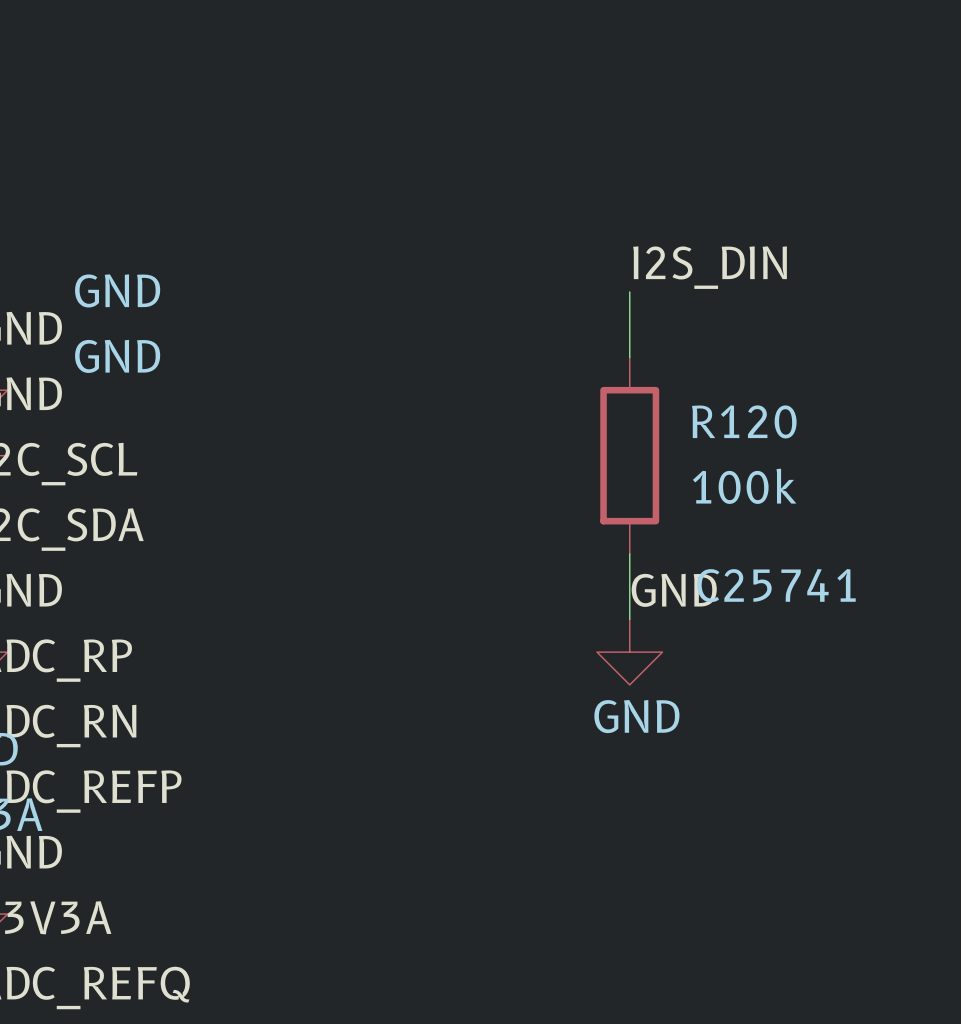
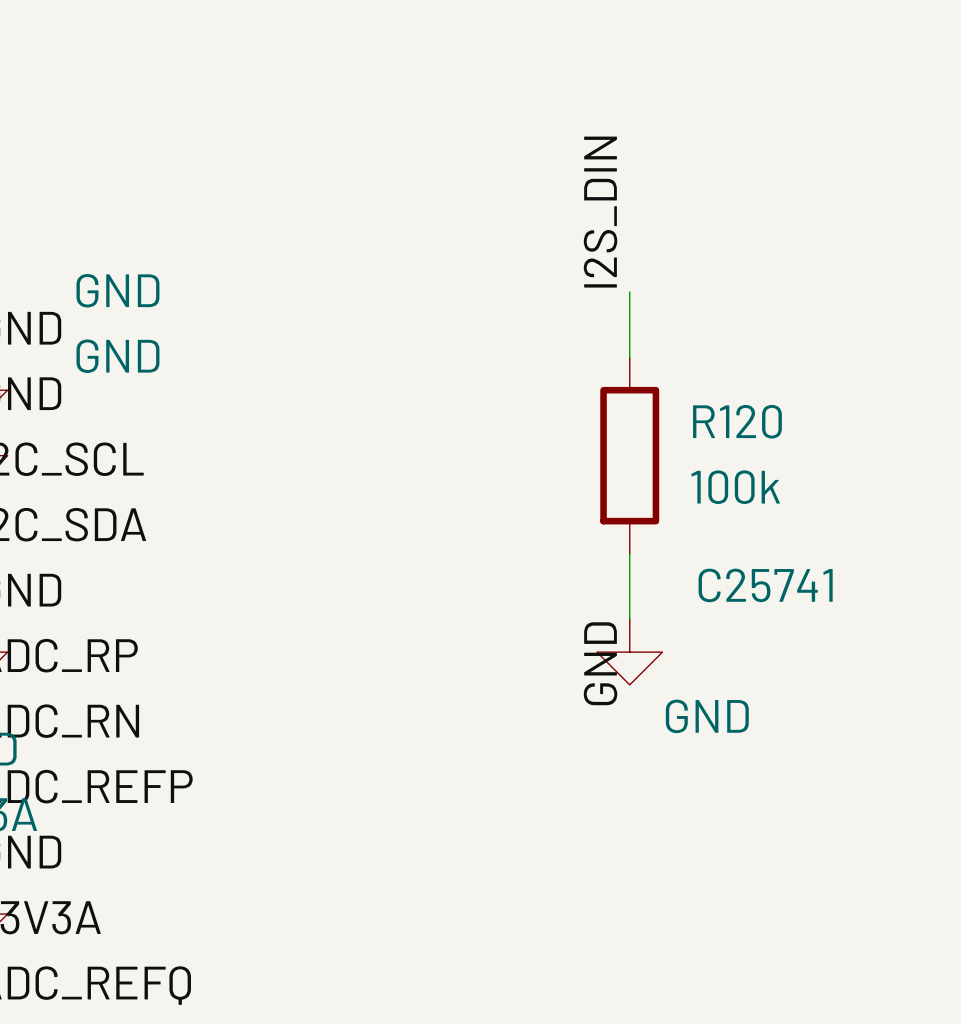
label rotation: 0° (710, 267) -> 90° counterclockwise (600, 212)
label rotation: 0° (674, 590) -> 90° counterclockwise (600, 663)
label position: GND (674, 590) -> GND (600, 663)
power symbol text position: GND (636, 716) -> GND (707, 716)

